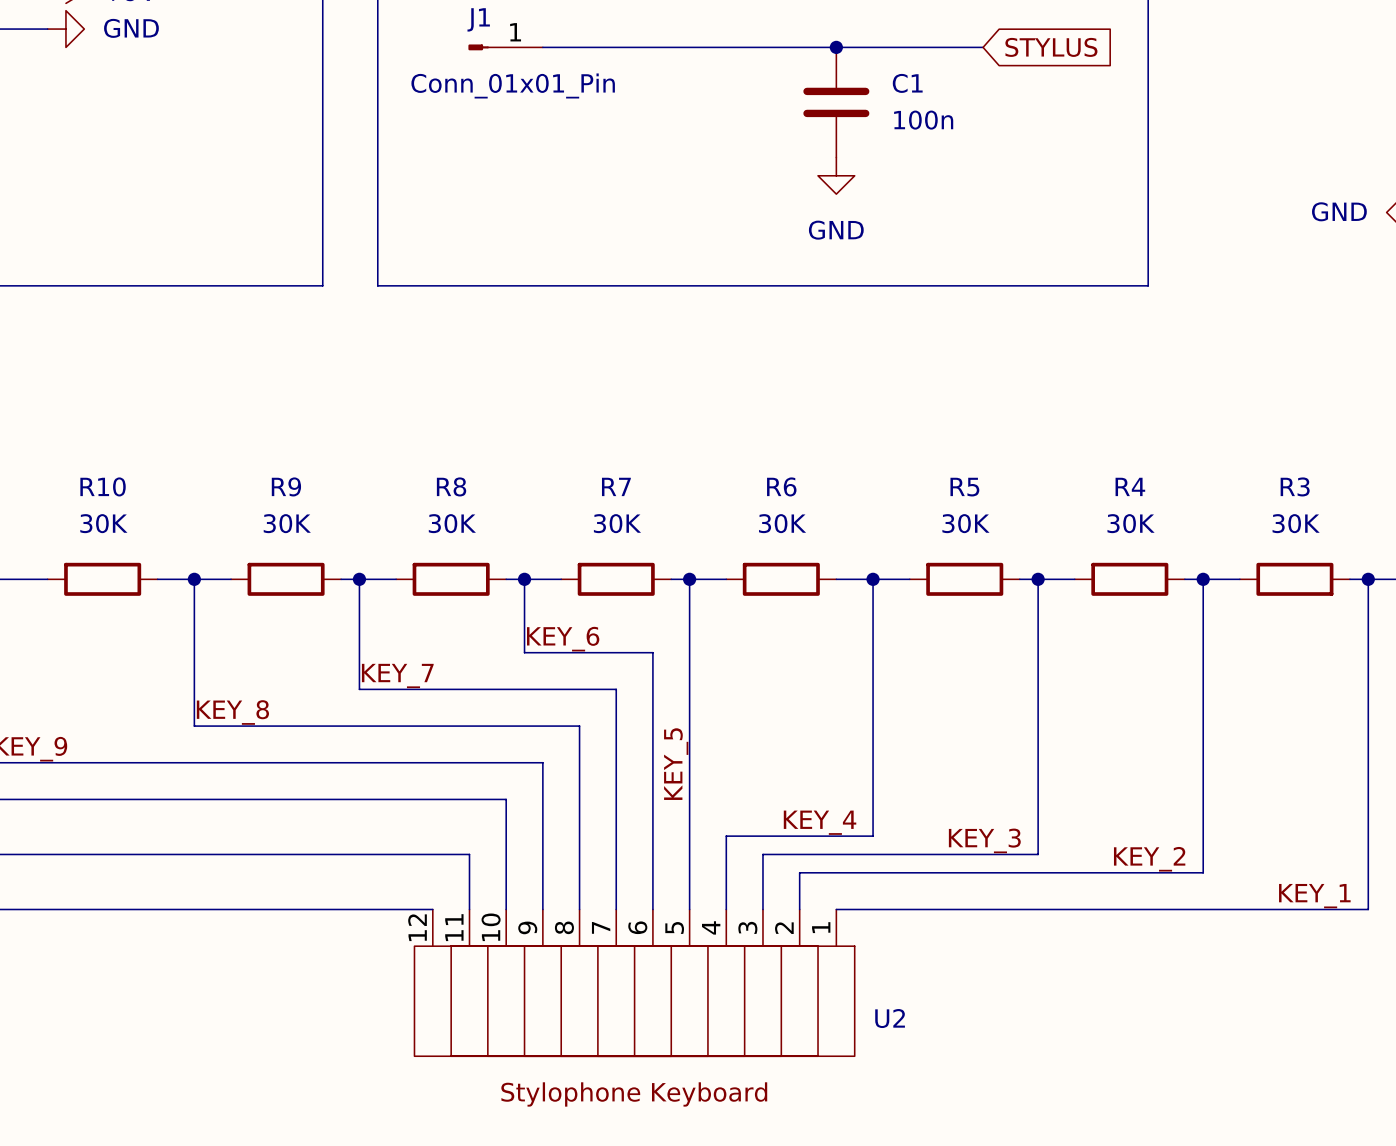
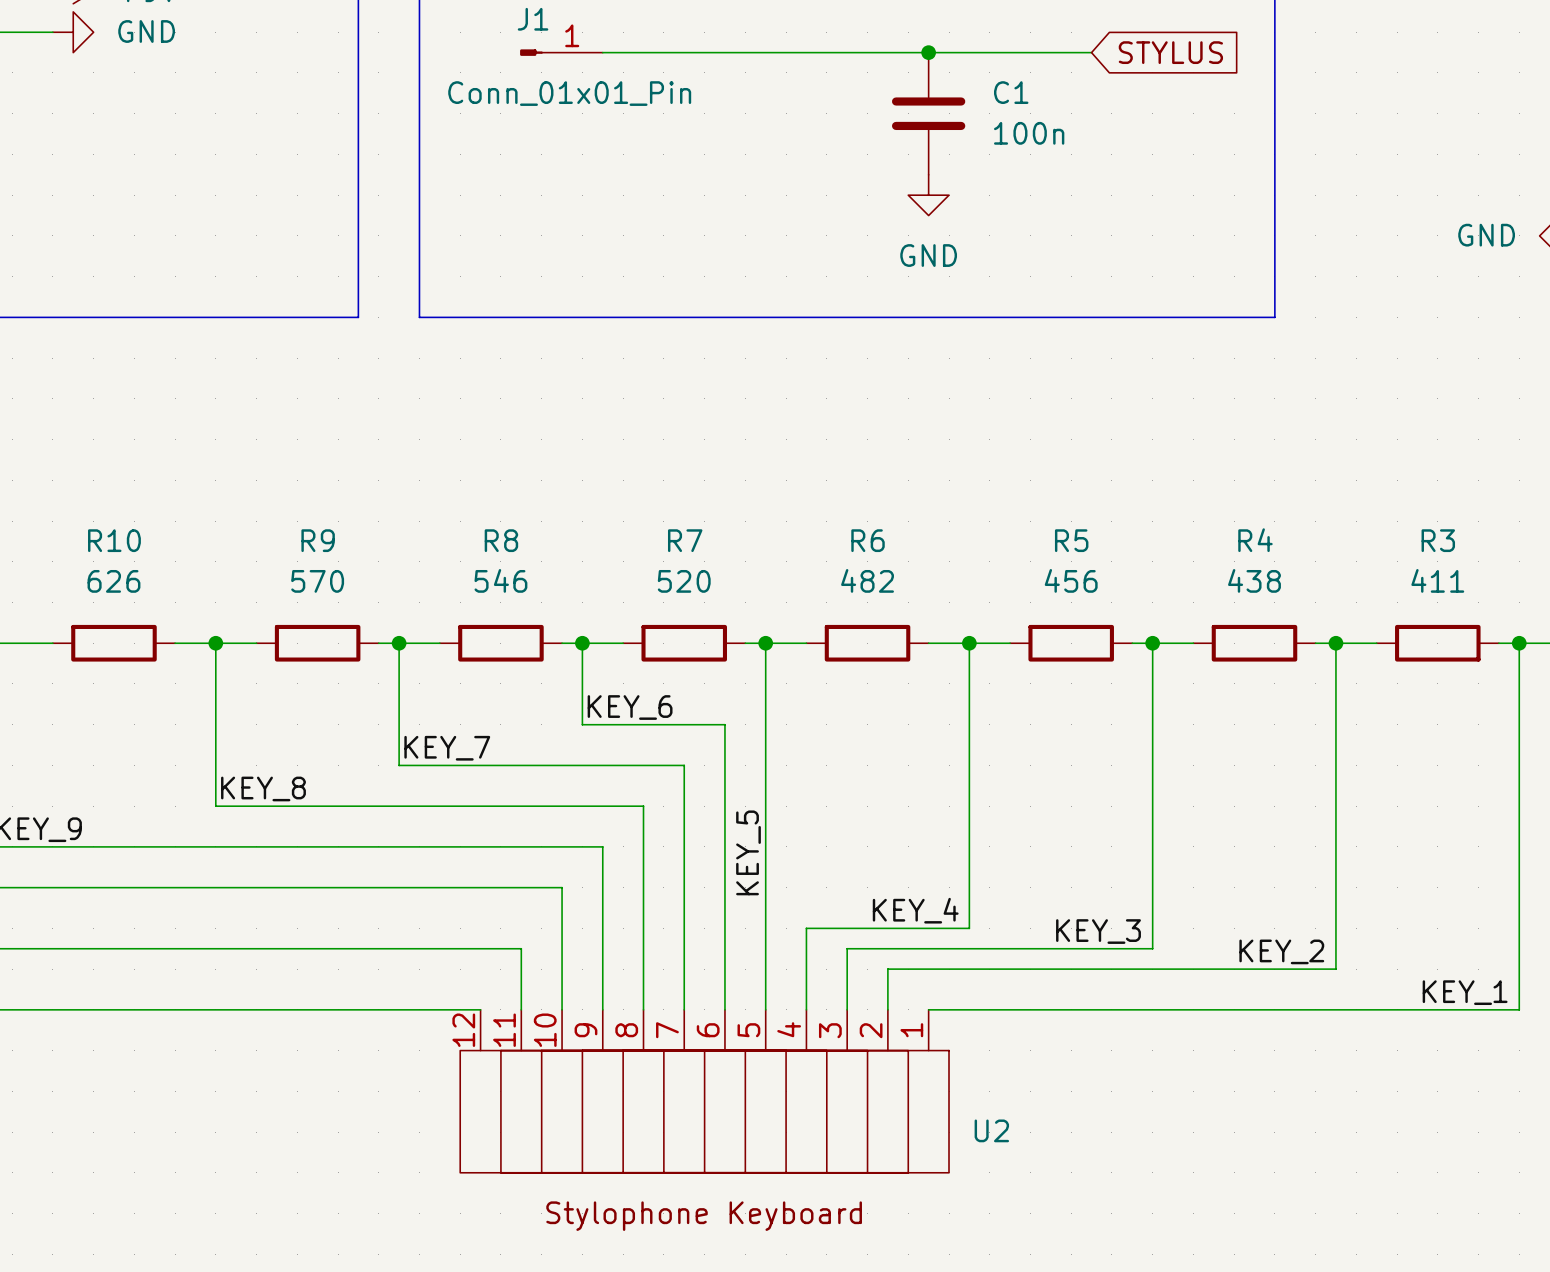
R10 value: 30K (103, 523) -> 626 (113, 581)
R9 value: 30K (287, 523) -> 570 (317, 581)
R8 value: 30K (452, 523) -> 546 (500, 580)
R7 value: 30K (617, 523) -> 520 (684, 581)
R6 value: 30K (782, 523) -> 482 (867, 580)
R5 value: 30K (965, 523) -> 456 (1071, 580)
R4 value: 30K (1131, 523) -> 438 (1254, 580)
R3 value: 30K (1296, 523) -> 411 (1437, 580)

